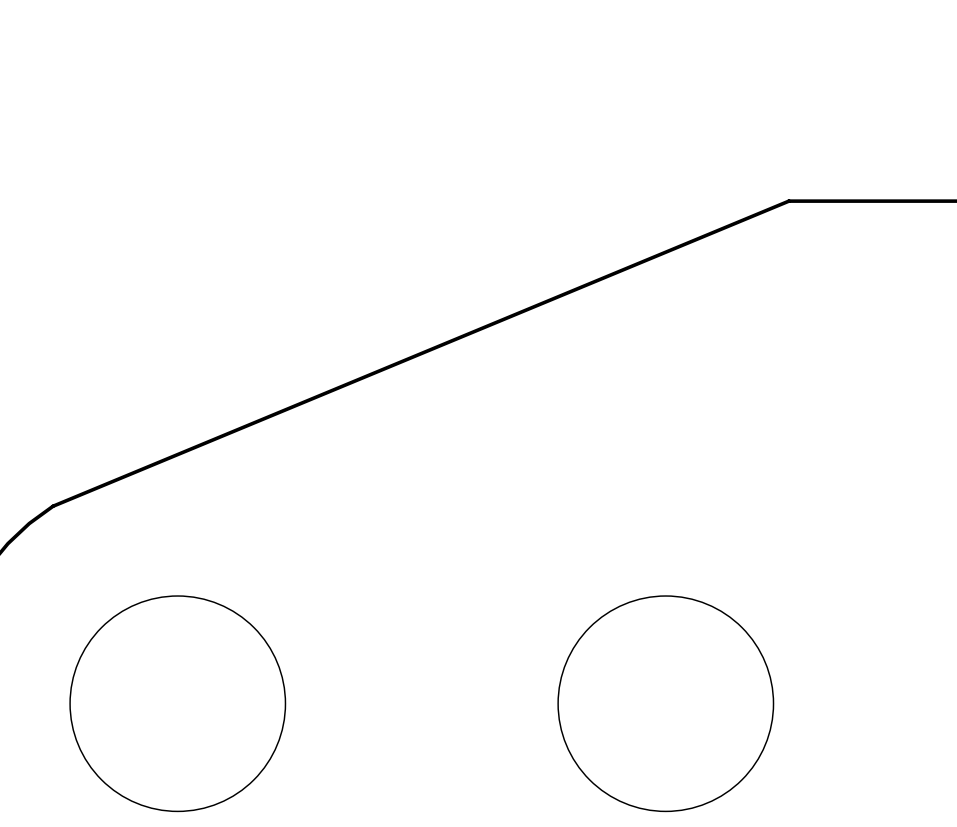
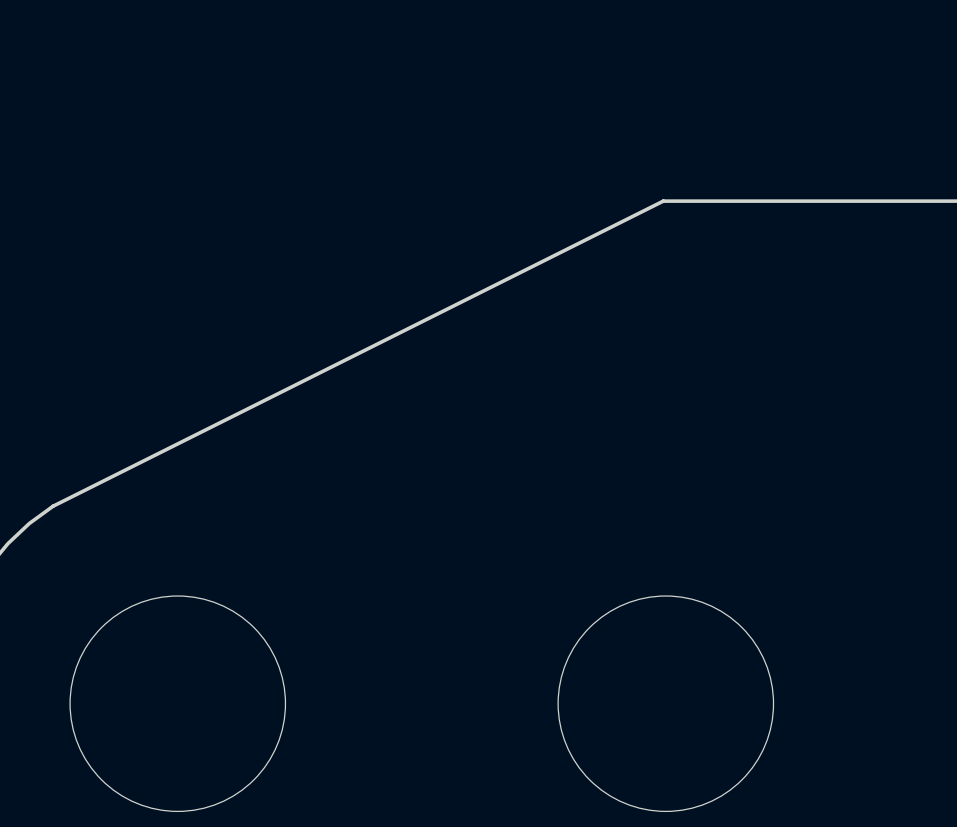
board edge: (788, 201) (53, 506) -> (788, 201) (663, 201) (53, 506)

